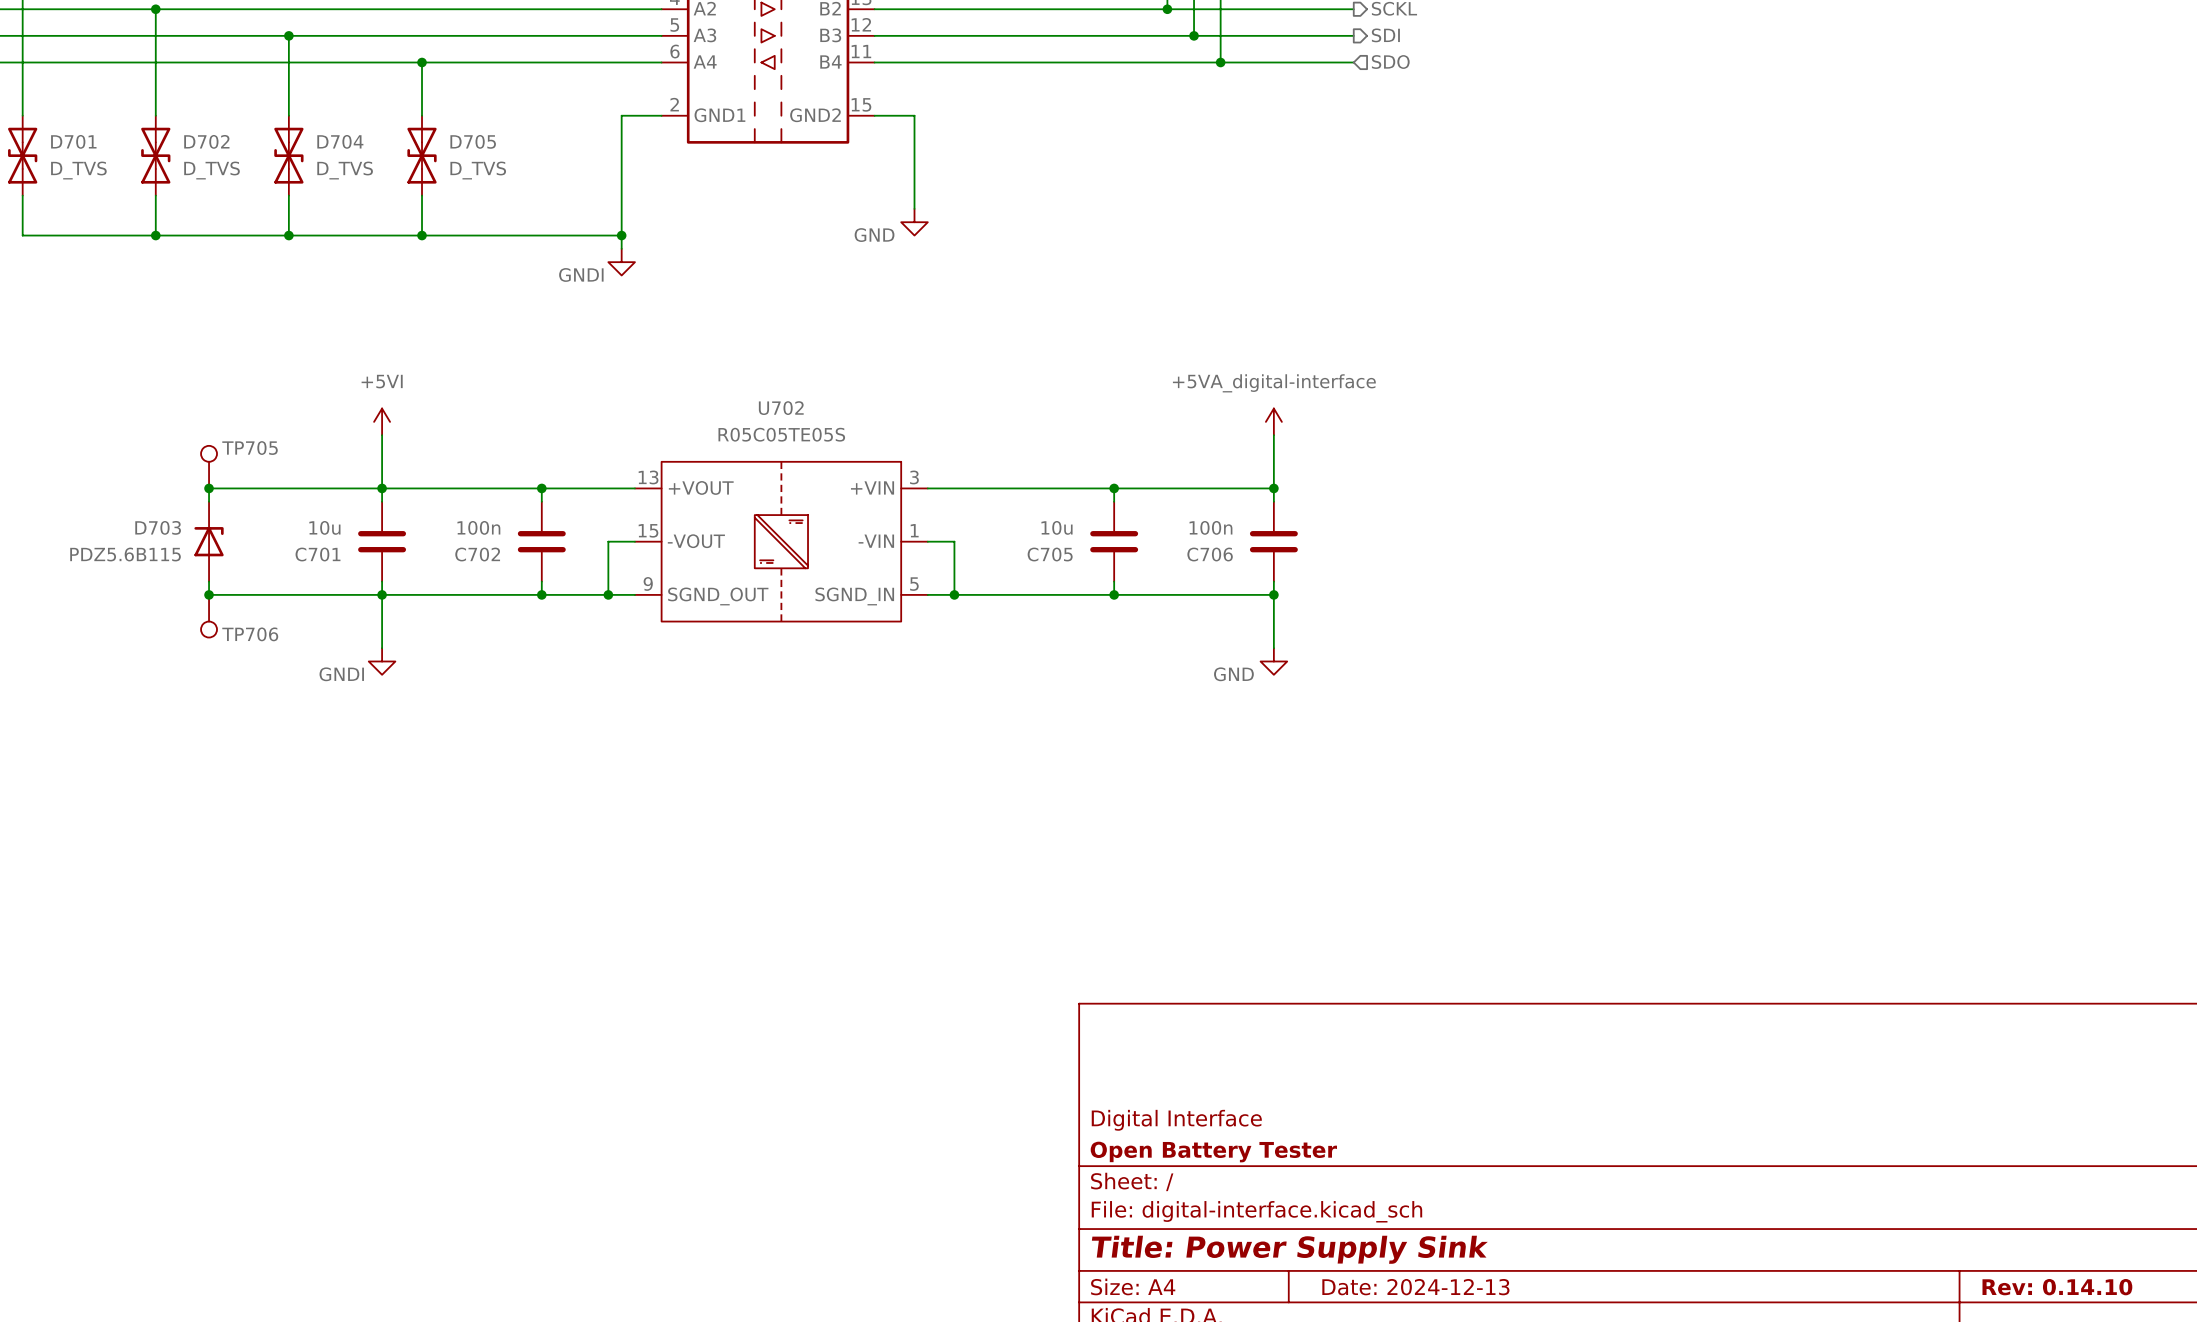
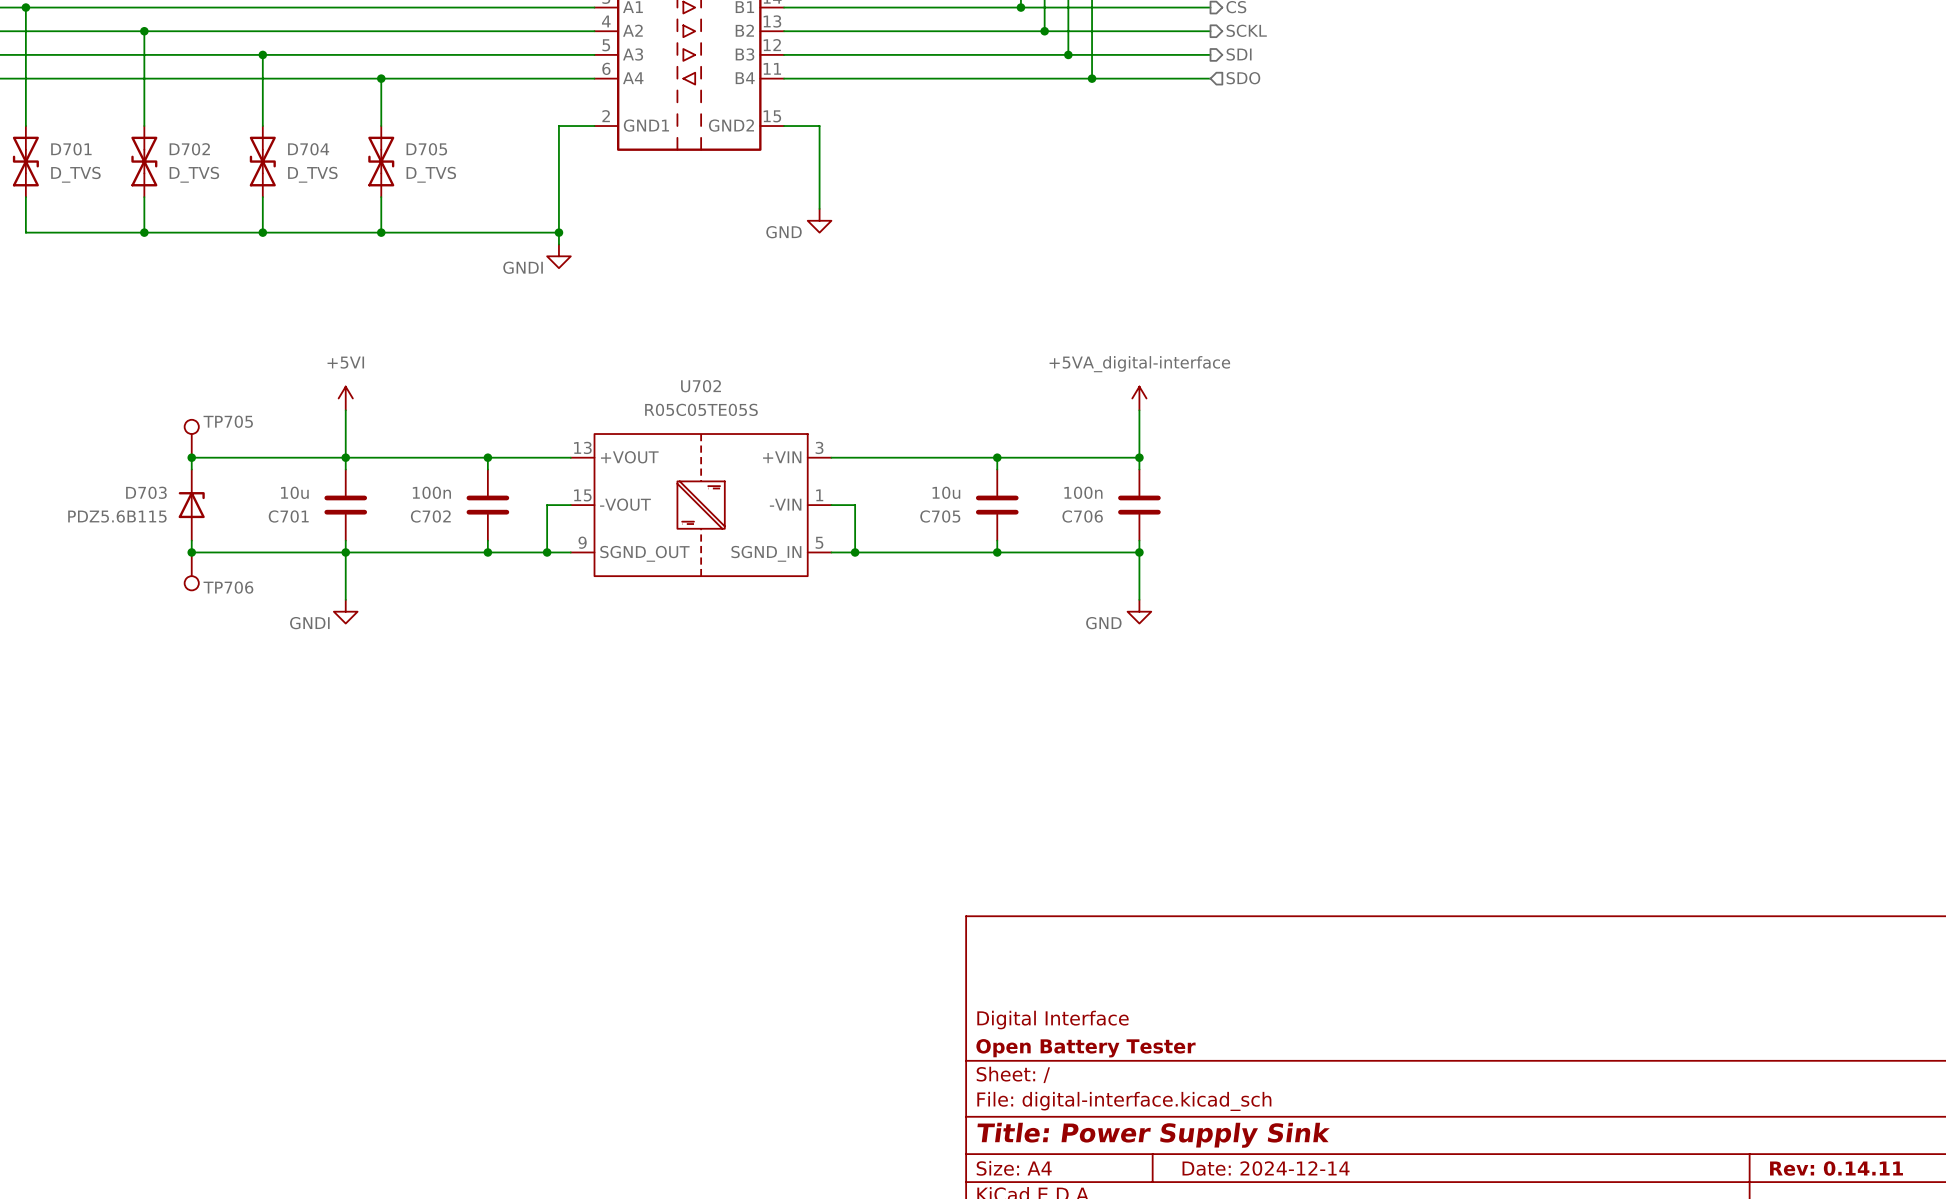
title block: Date: 2024-12-13 (1415, 1287) -> Date: 2024-12-14 (1266, 1168)
title block: Rev: 0.14.10 (2057, 1287) -> Rev: 0.14.11 (1836, 1168)

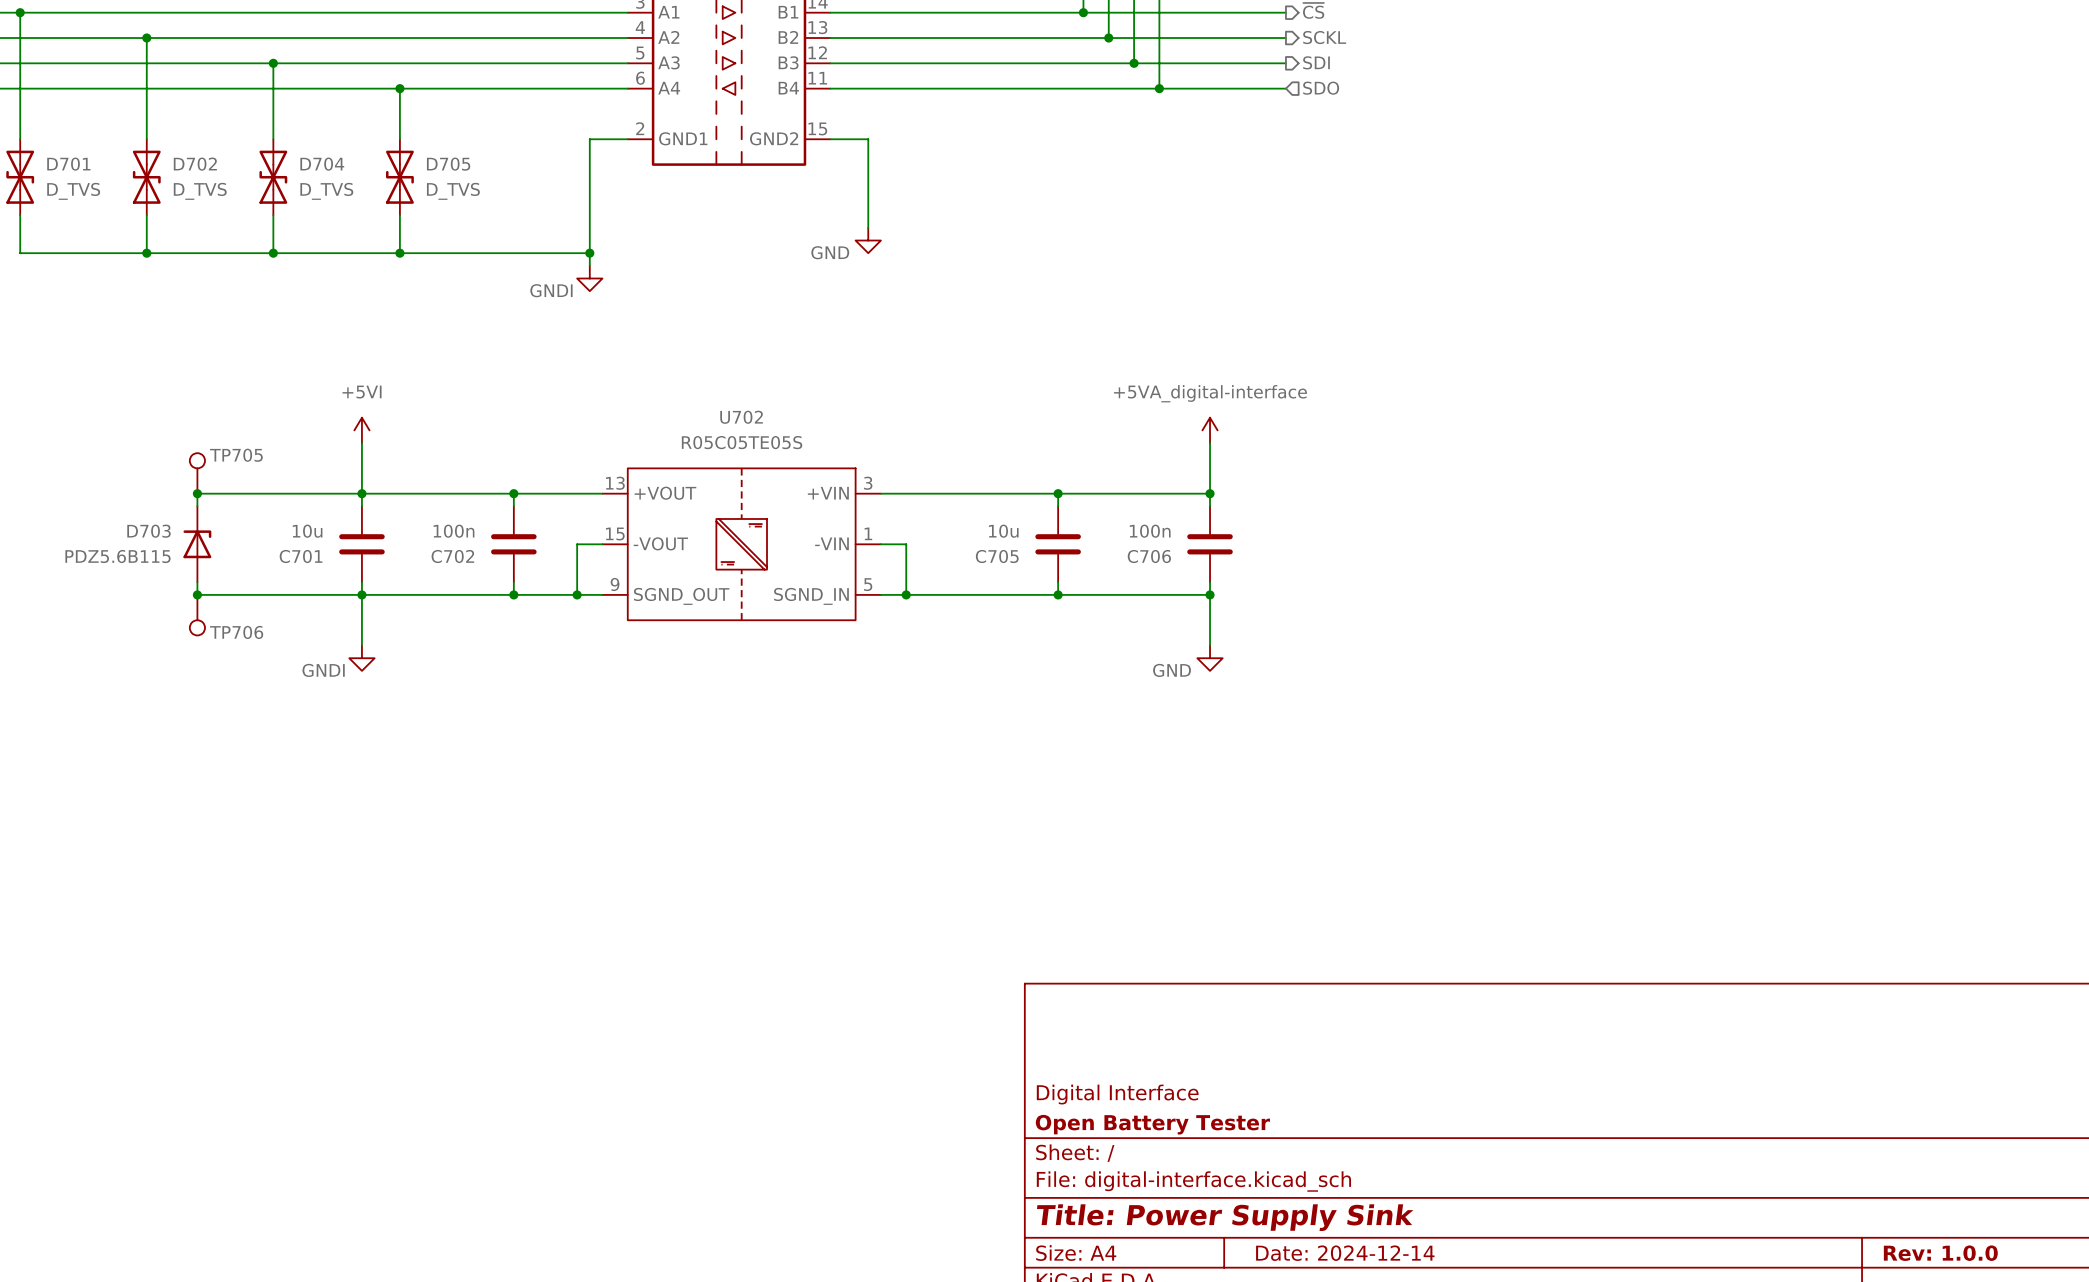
title block: Rev: 0.14.11 (1836, 1168) -> Rev: 1.0.0 (1940, 1253)

